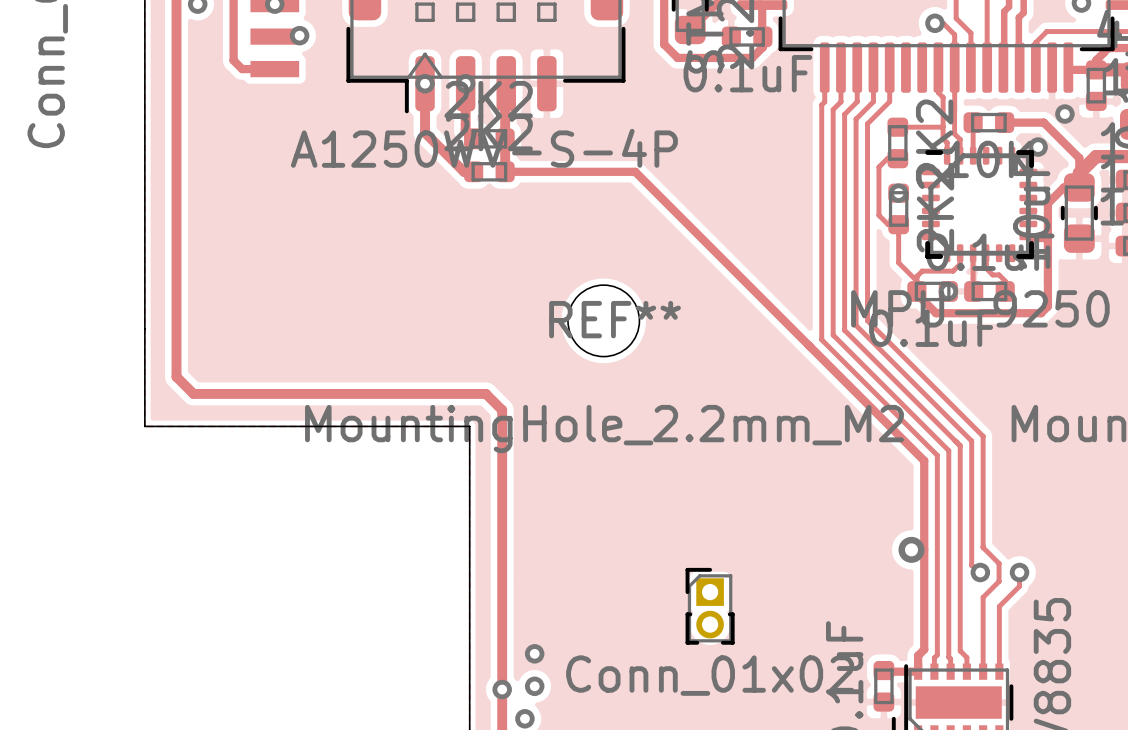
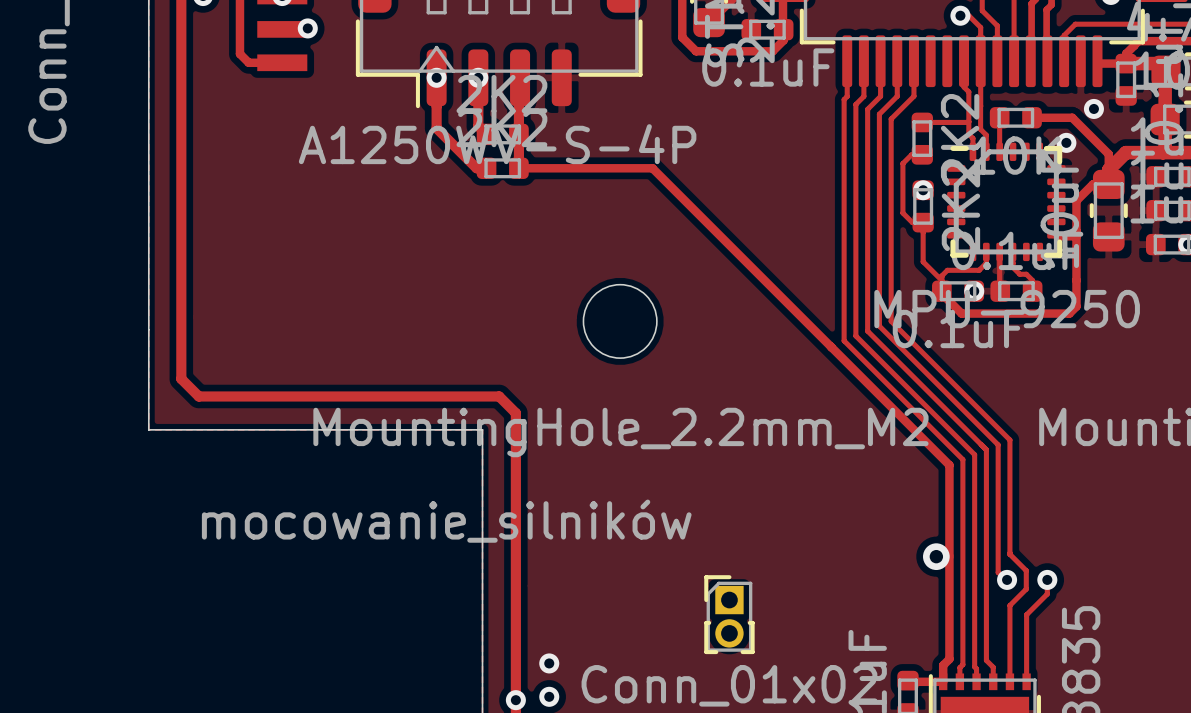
REF** name: REF** (615, 319) -> none
drawing: none -> [201, 499, 692, 543]

